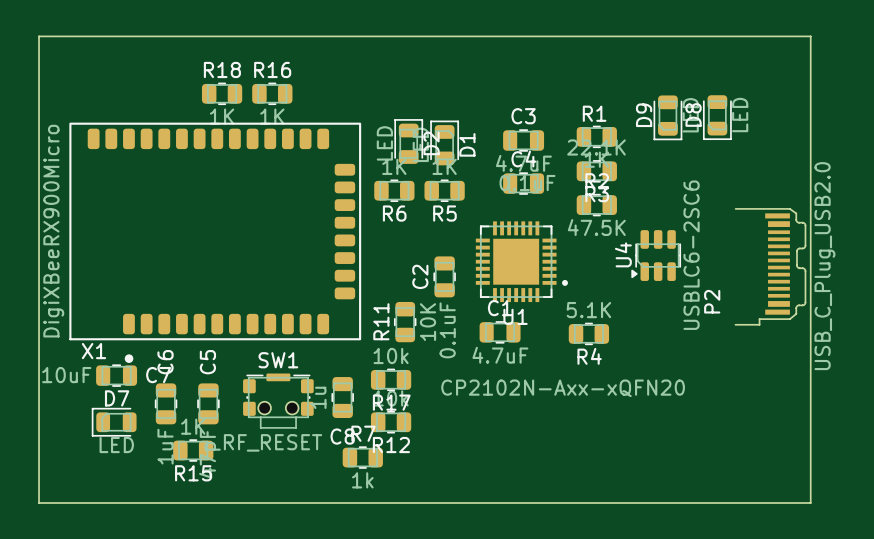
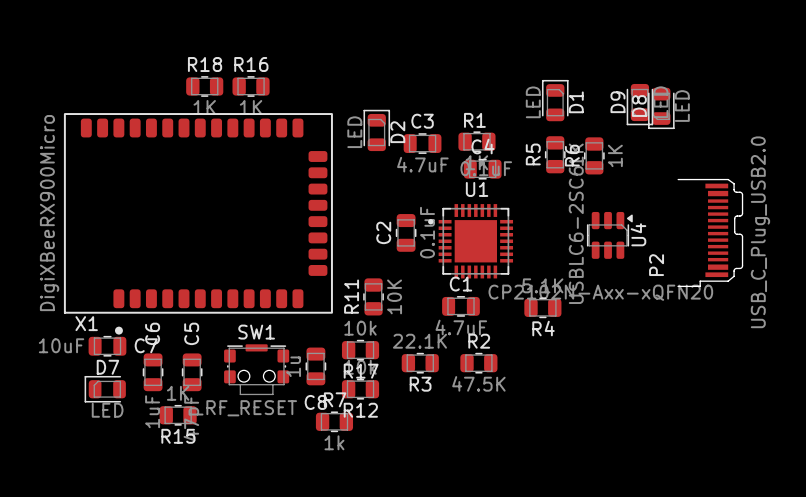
board edge: (39, 36) (810, 36) (810, 503) (39, 503) (39, 36) -> none
D9 position: (667, 117) -> (639, 104)
R1 position: (596, 136) -> (476, 141)
C3 position: (523, 140) -> (422, 143)
D1 position: (444, 142) -> (555, 100)
R3 position: (596, 171) -> (420, 363)
R6 rotation: 0° (394, 190) -> 90° clockwise (594, 155)
R6 position: (394, 190) -> (594, 155)
R5 rotation: 0° (444, 190) -> 90° clockwise (555, 154)
R5 position: (444, 190) -> (555, 154)
R2 position: (596, 205) -> (478, 363)
U4 rotation: 0° (656, 255) -> 180° (609, 235)
U1 rotation: 0° (521, 261) -> 180° (470, 241)
P2 position: (770, 266) -> (710, 232)
C2 position: (444, 276) -> (406, 232)
C2 value position: 0.1uF (447, 330) -> 0.1uF (427, 232)
U1 value position: CP2102N-Axx-xQFN20 (563, 388) -> CP2102N-Axx-xQFN20 (600, 292)

